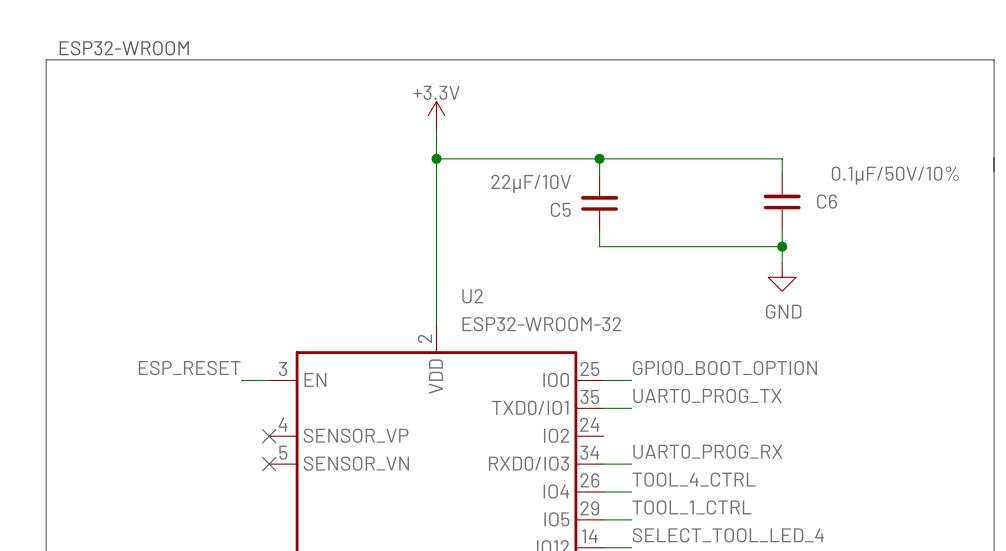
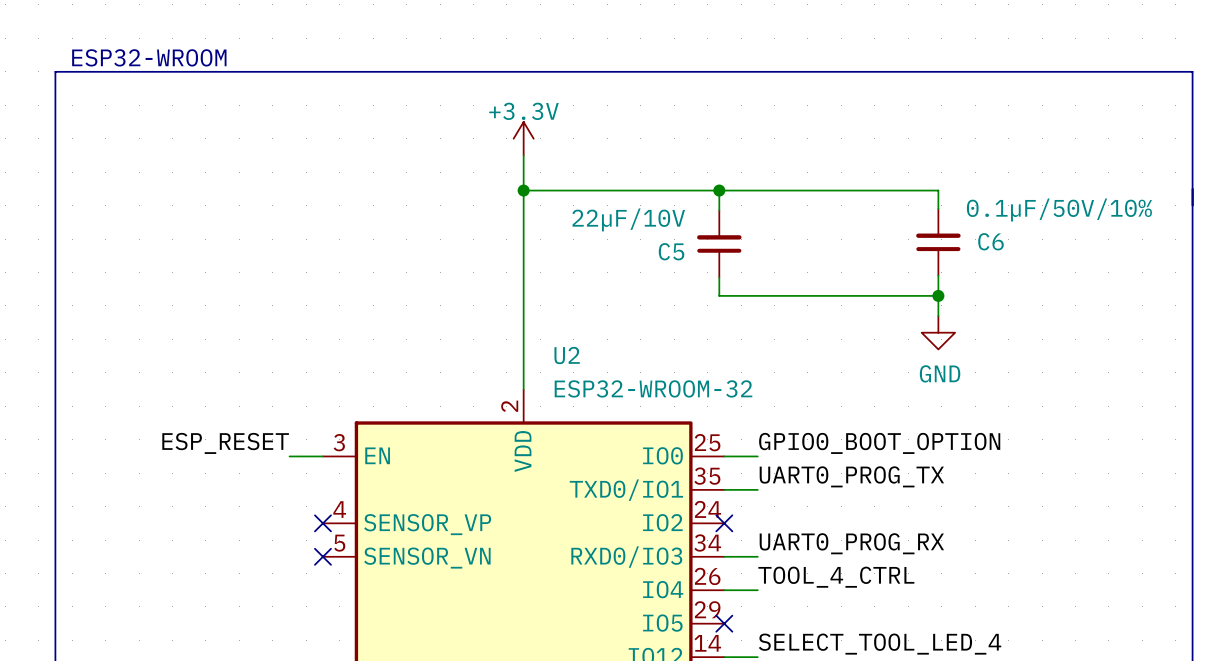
no-connect mark: none -> (724, 523)
label: TOOL_1_CTRL (692, 507) -> none
wire: (603, 519) (631, 519) -> none
no-connect mark: none -> (724, 623)

